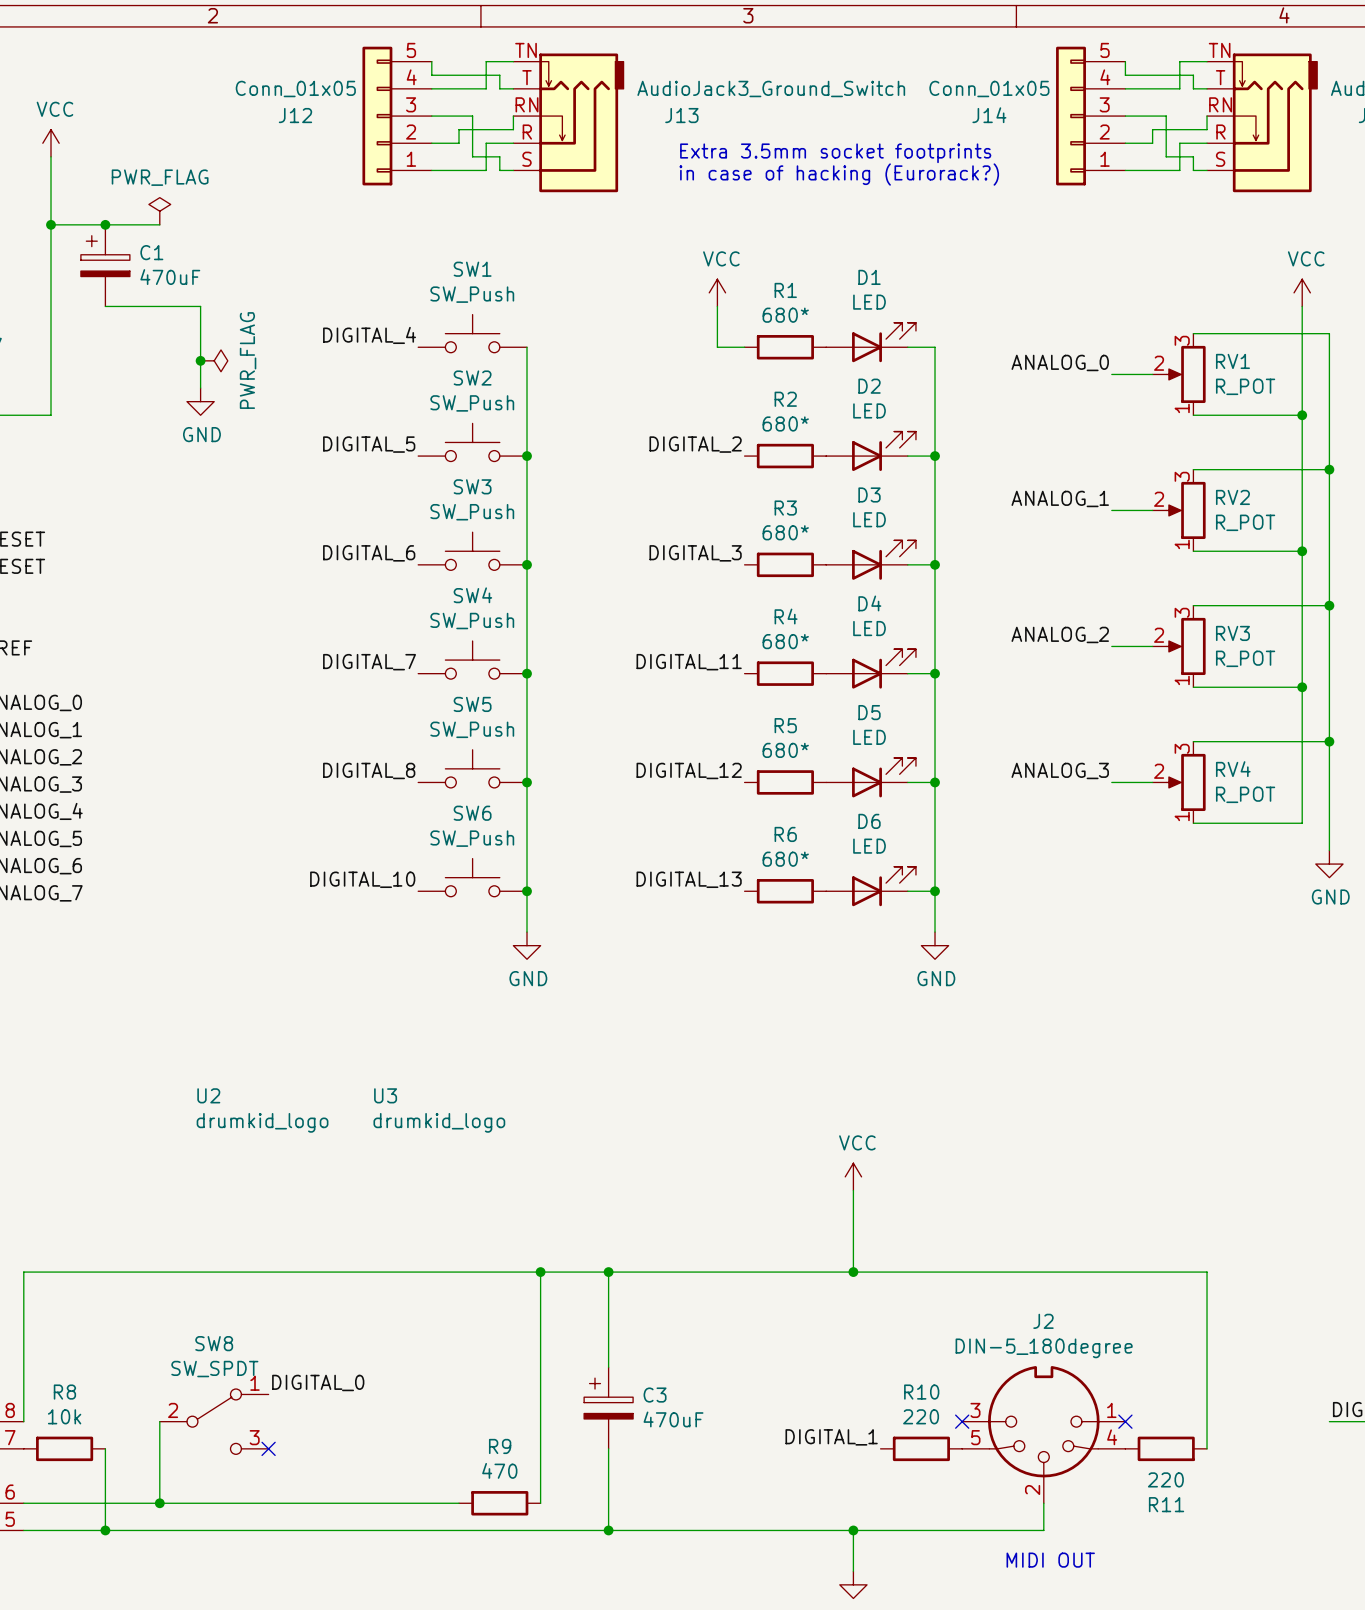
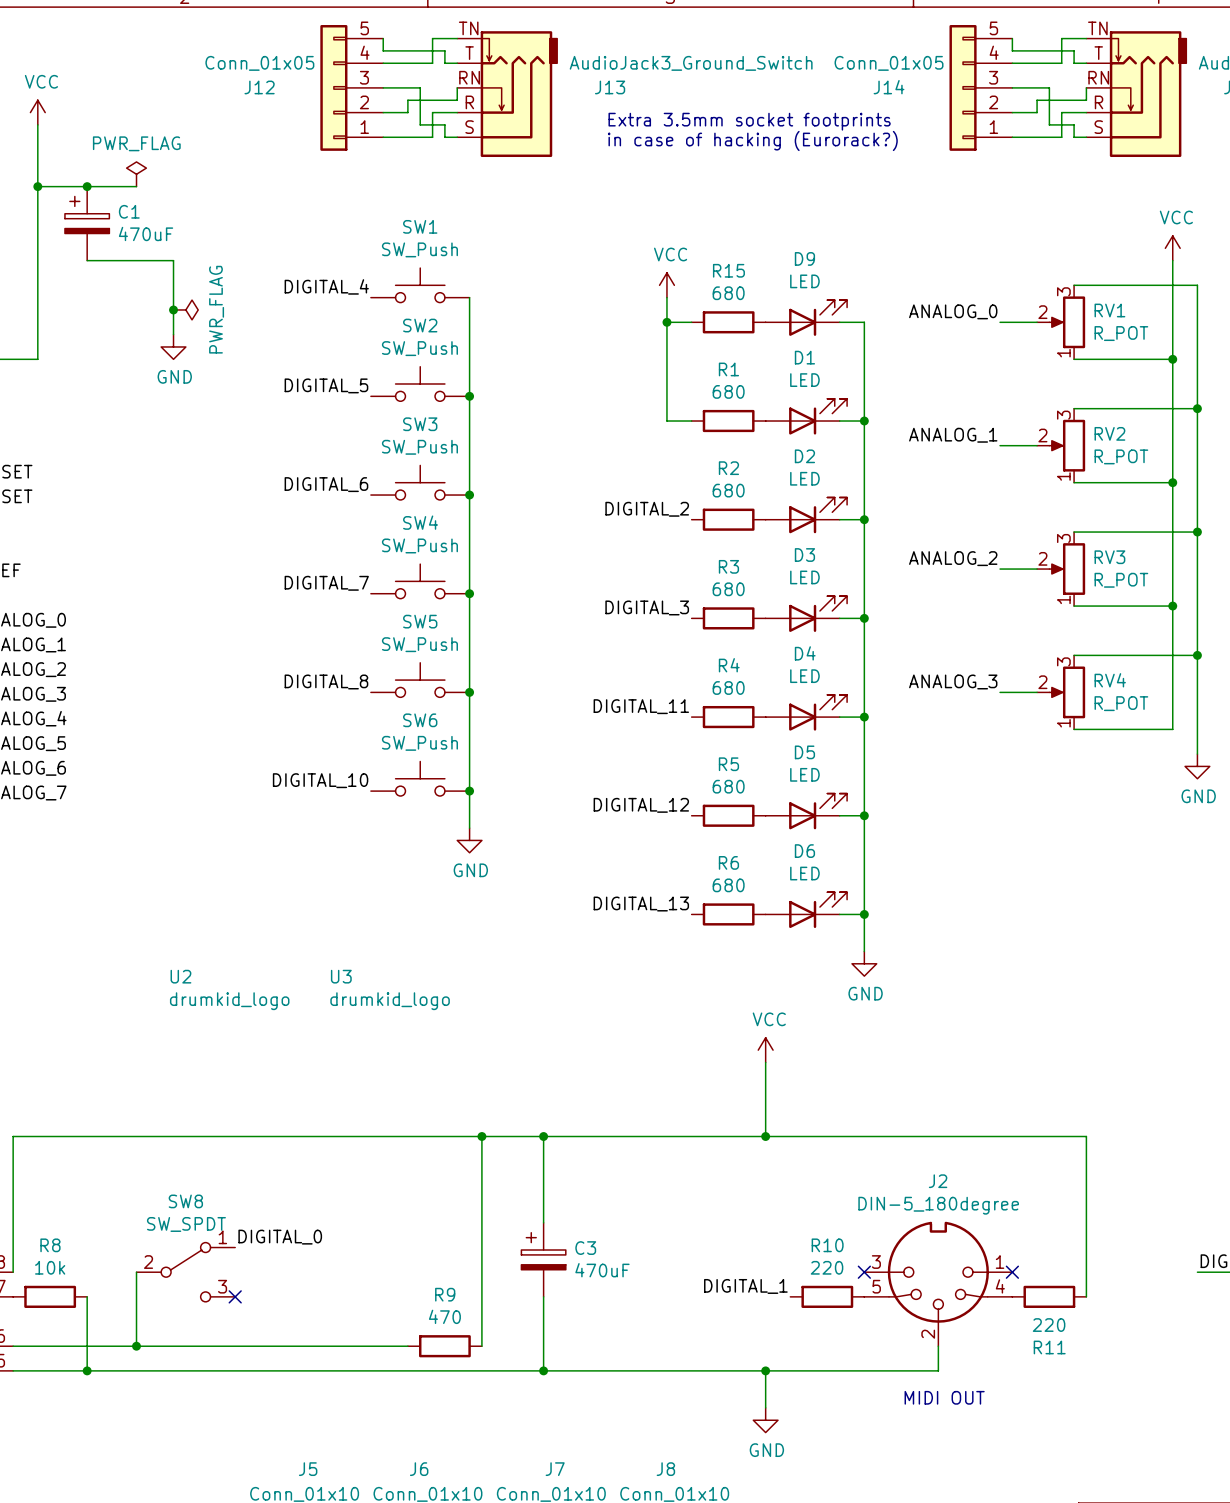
power symbol position: VCC (717, 292) -> VCC (666, 285)
wire: (717, 306) (717, 347) (744, 347) -> (691, 421) (666, 421) (666, 297)
R1 value: 680* (785, 315) -> 680 (728, 391)
D1 position: (871, 342) -> (806, 416)
R1 position: (785, 347) -> (728, 421)
wire: (907, 347) (935, 347) (935, 932) -> none
D9: none -> LED (806, 318)
wire: none -> (666, 322) (691, 322)
junction: none -> (666, 322)
R15: none -> 680 (728, 322)
wire: none -> (839, 322) (864, 322) (864, 951)
R2 value: 680* (785, 423) -> 680 (728, 490)
label position: DIGITAL_2 (695, 444) -> DIGITAL_2 (647, 509)
D2 position: (871, 451) -> (806, 515)
R2 position: (785, 456) -> (728, 519)
wire: (907, 456) (935, 456) -> (839, 421) (864, 421)
junction position: (935, 456) -> (864, 421)
R3 value: 680* (785, 532) -> 680 (728, 589)
label position: DIGITAL_3 (695, 553) -> DIGITAL_3 (647, 607)
D3 position: (871, 560) -> (806, 614)
R3 position: (785, 564) -> (728, 618)
wire: (907, 564) (935, 564) -> (839, 519) (864, 519)
junction position: (935, 564) -> (864, 519)
R4 value: 680* (785, 641) -> 680 (728, 687)
label position: DIGITAL_11 (689, 662) -> DIGITAL_11 (641, 706)
D4 position: (871, 668) -> (806, 712)
R4 position: (785, 673) -> (728, 717)
wire: (907, 673) (935, 673) -> (839, 618) (864, 618)
junction position: (935, 673) -> (864, 618)
R5 value: 680* (785, 750) -> 680 (728, 786)
label position: DIGITAL_12 (689, 770) -> DIGITAL_12 (641, 805)
D5 position: (871, 777) -> (806, 811)
R5 position: (785, 782) -> (728, 815)
wire: (907, 782) (935, 782) -> (839, 717) (864, 717)
junction position: (935, 782) -> (864, 717)
R6 value: 680* (785, 859) -> 680 (728, 885)
label position: DIGITAL_13 (689, 879) -> DIGITAL_13 (641, 904)
D6 position: (871, 886) -> (806, 910)
R6 position: (785, 891) -> (728, 914)
wire: (907, 891) (935, 891) -> (839, 815) (864, 815)
junction position: (935, 891) -> (864, 815)
power symbol position: GND (935, 945) -> GND (864, 963)
wire: none -> (839, 914) (864, 914)
junction: none -> (864, 914)

